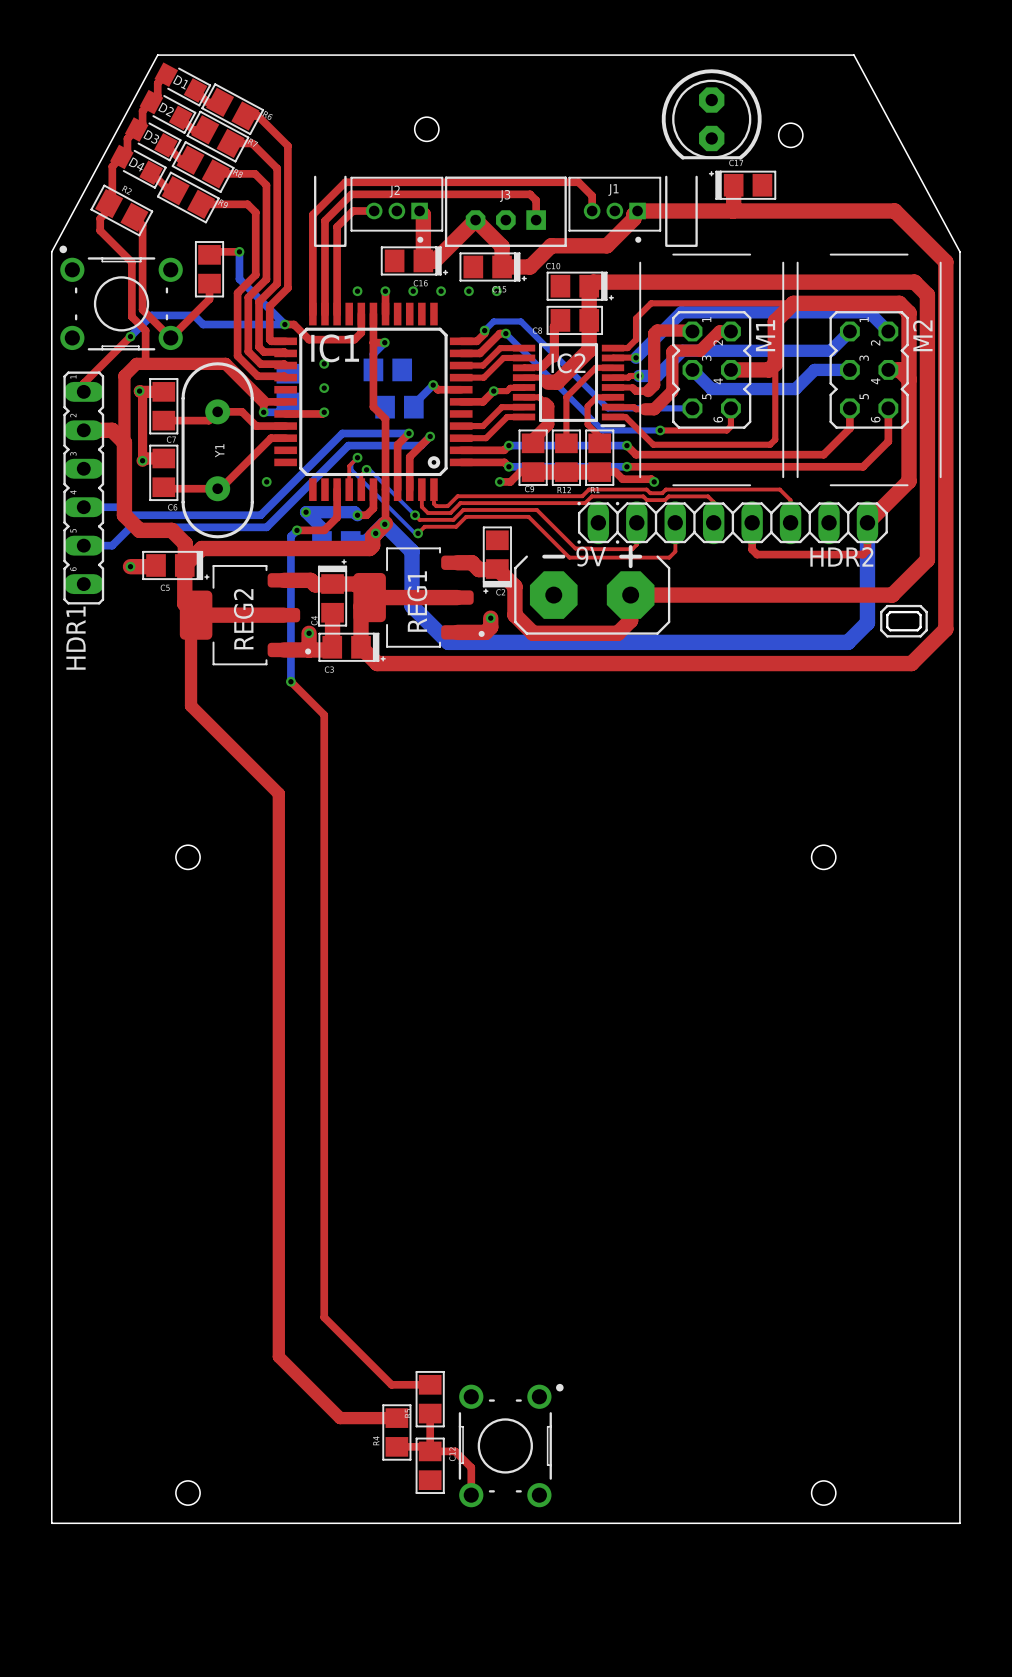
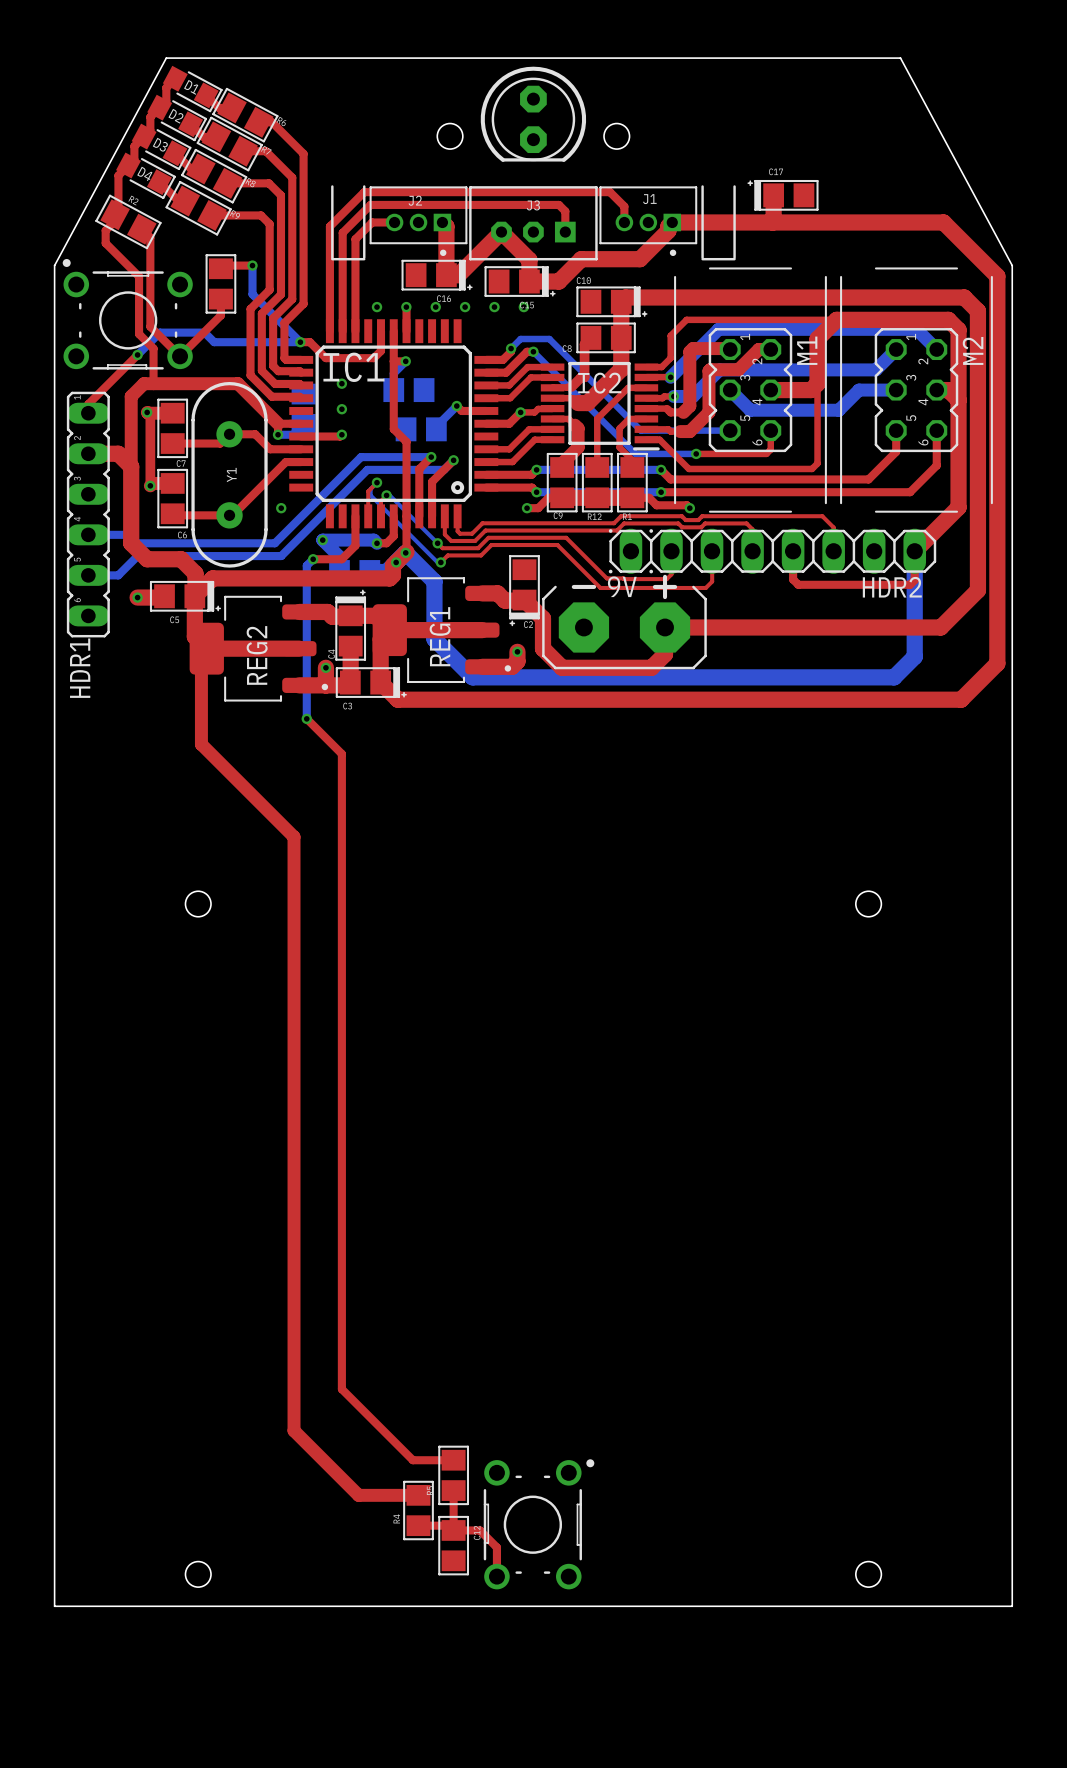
part position: (711, 114) -> (533, 114)
round board edge position: (790, 135) -> (616, 136)
line: (887, 606) (920, 606) (926, 612) (926, 630) (920, 636) (887, 636) (881, 630) (881, 612) (887, 606) -> none
board edge: (890, 612) (917, 612) (920, 615) (920, 627) (917, 630) (890, 630) (887, 627) (887, 615) (890, 612) -> none

